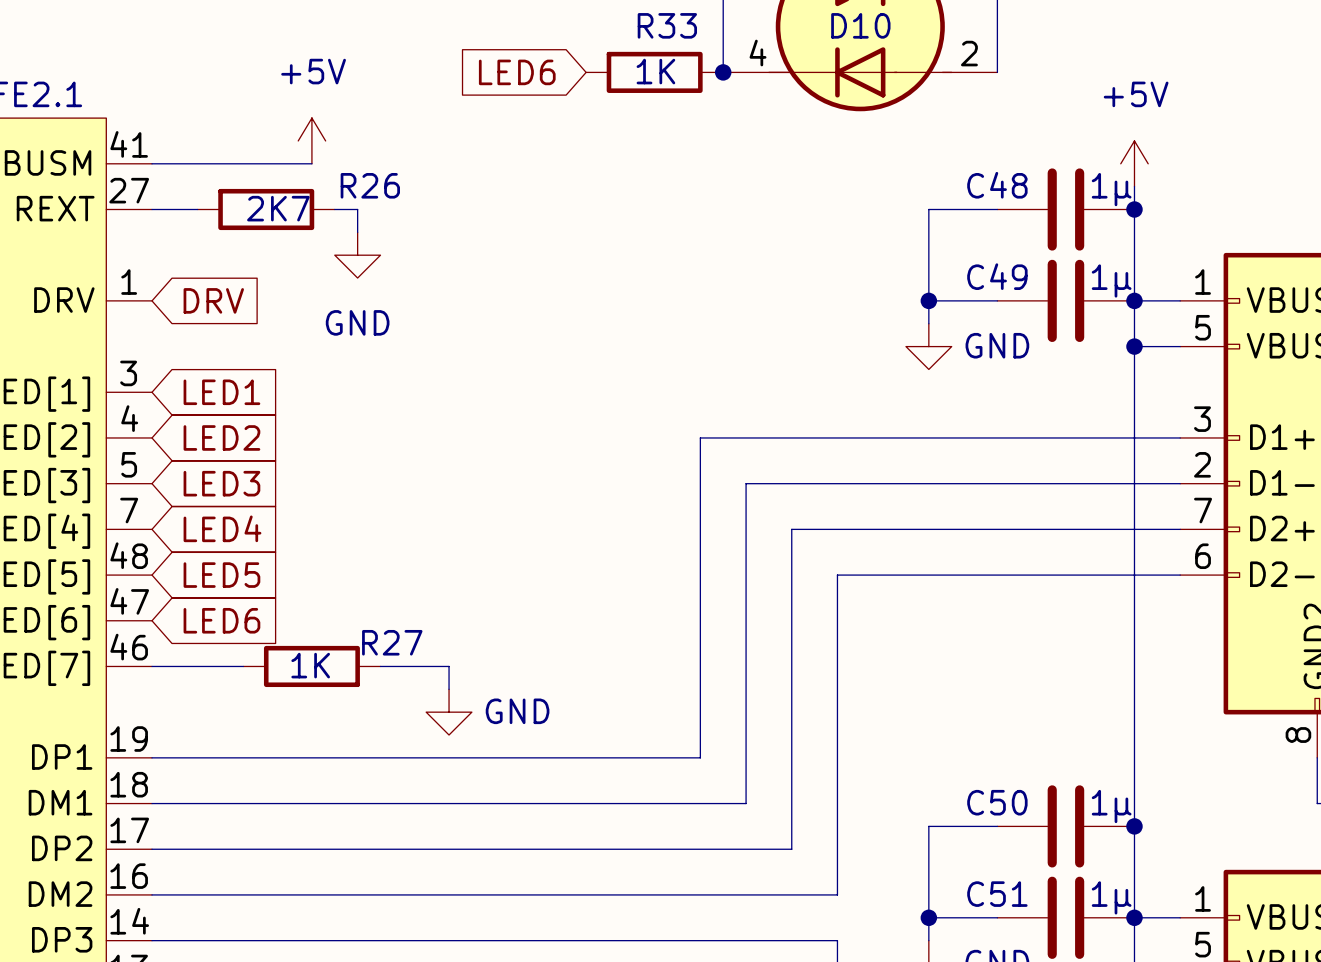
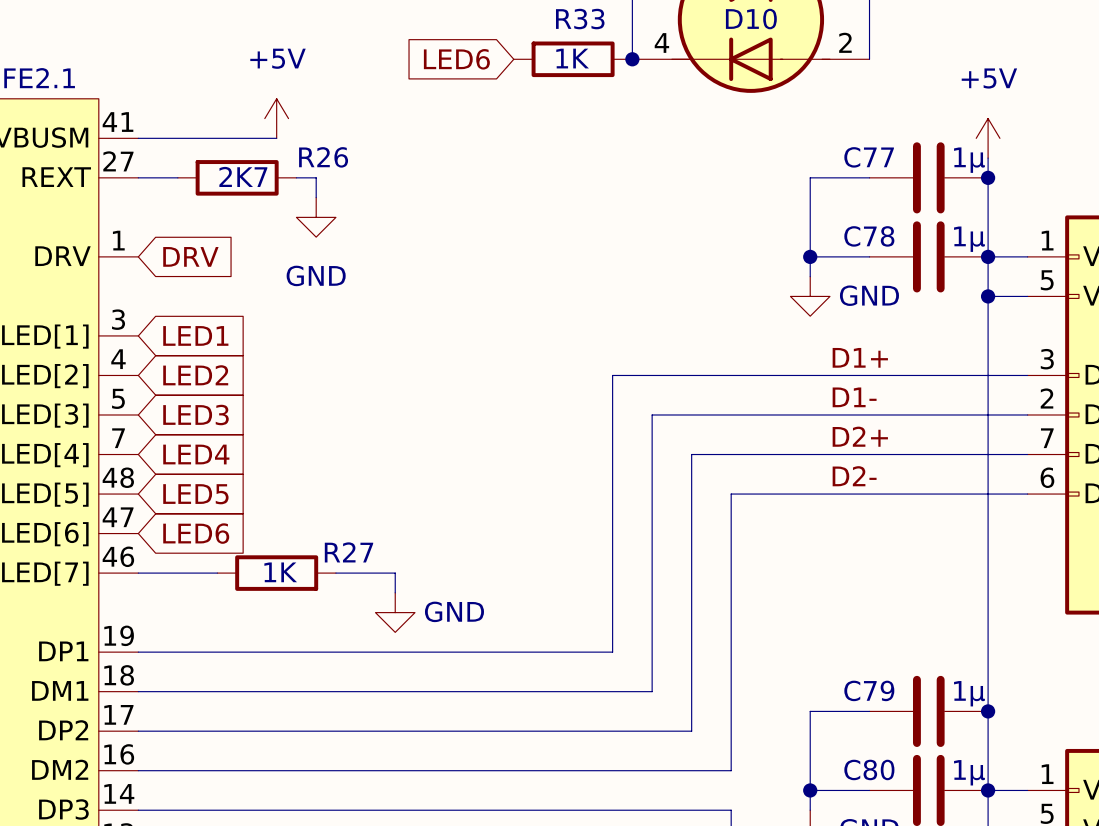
C48 name: C48 (997, 185) -> C77 (869, 157)
C49 name: C49 (997, 276) -> C78 (869, 236)
label: none -> D1+ (860, 357)
label: none -> D1- (854, 397)
label: none -> D2+ (860, 436)
label: none -> D2- (854, 476)
C50 name: C50 (997, 802) -> C79 (869, 690)
C51 name: C51 (997, 894) -> C80 (869, 769)

